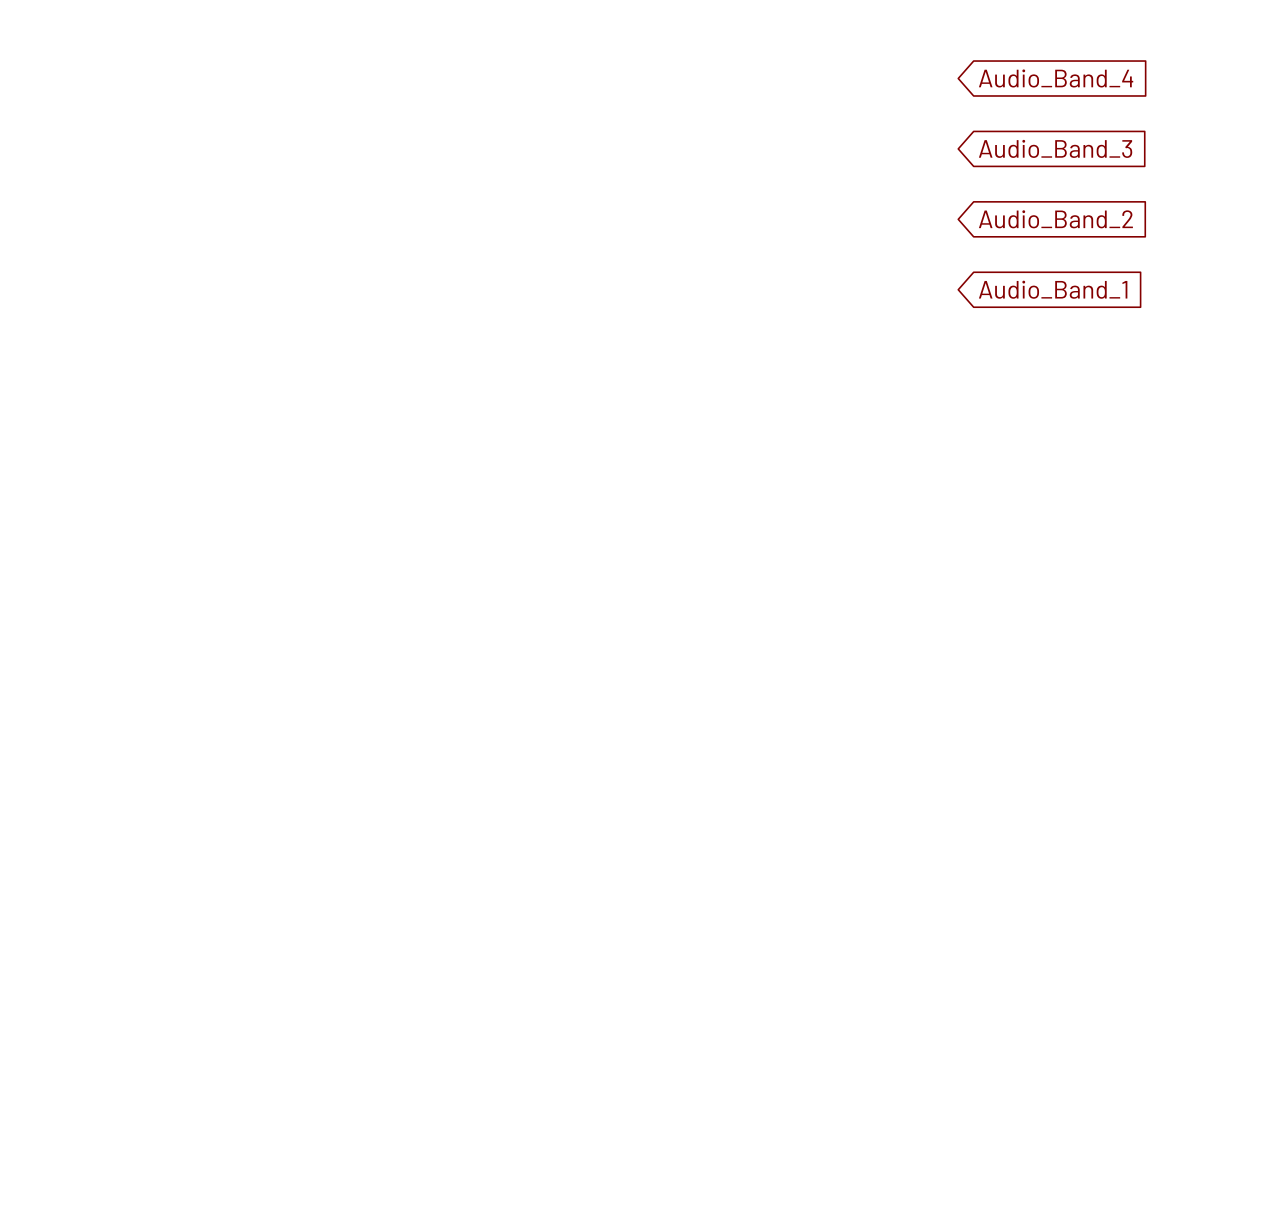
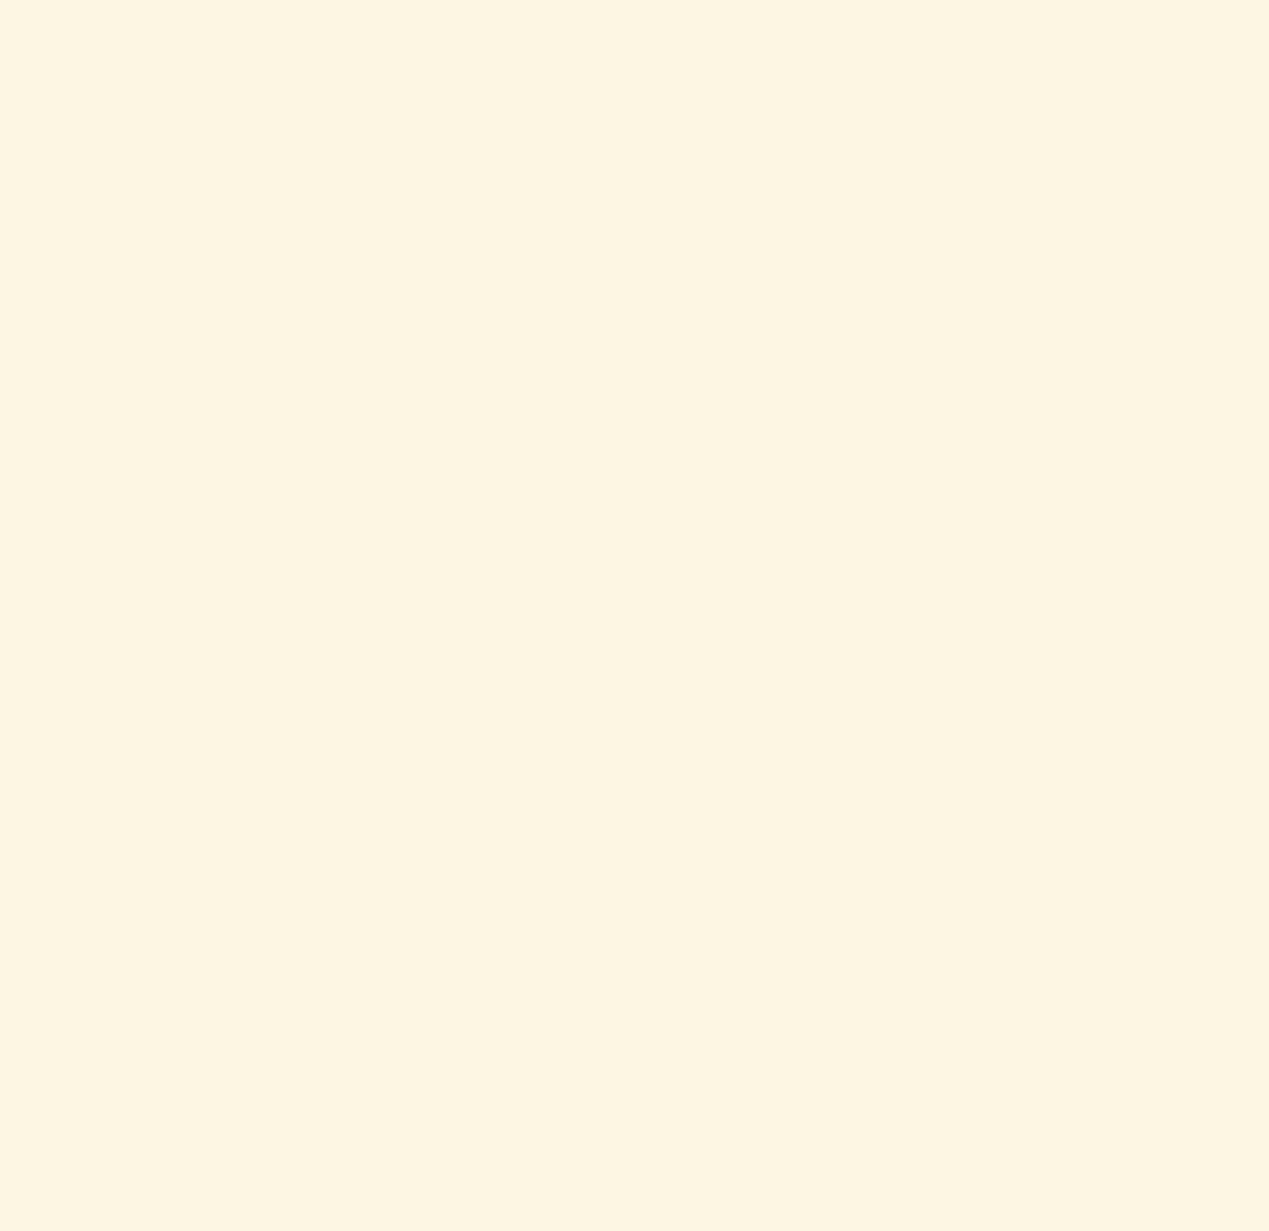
global label: Audio_Band_4 (1056, 78) -> none
global label: Audio_Band_3 (1055, 148) -> none
global label: Audio_Band_2 (1055, 219) -> none
global label: Audio_Band_1 (1053, 289) -> none

